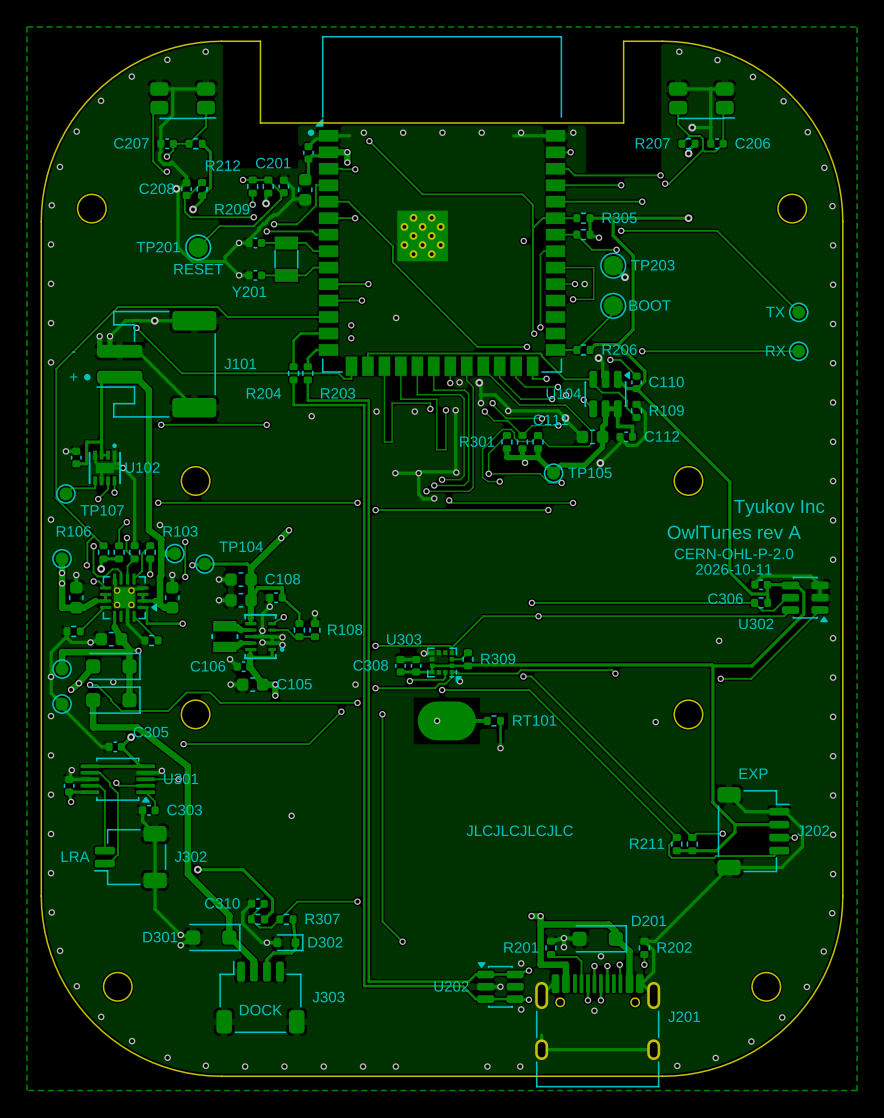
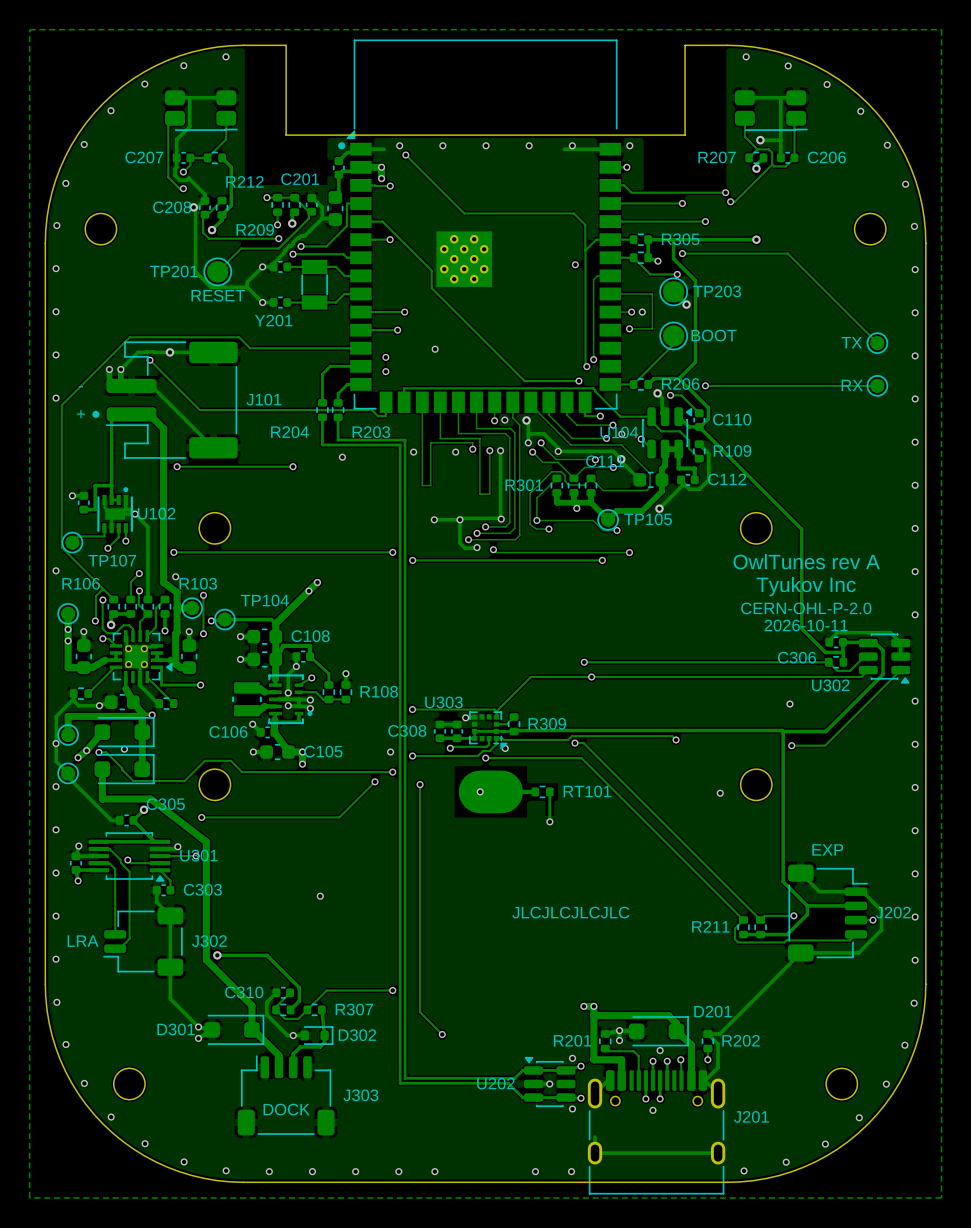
text: Tyukov Inc (779, 508) -> none
text: none -> OwlTunes rev A (806, 561)
text: OwlTunes rev A (734, 532) -> Tyukov Inc (806, 586)

